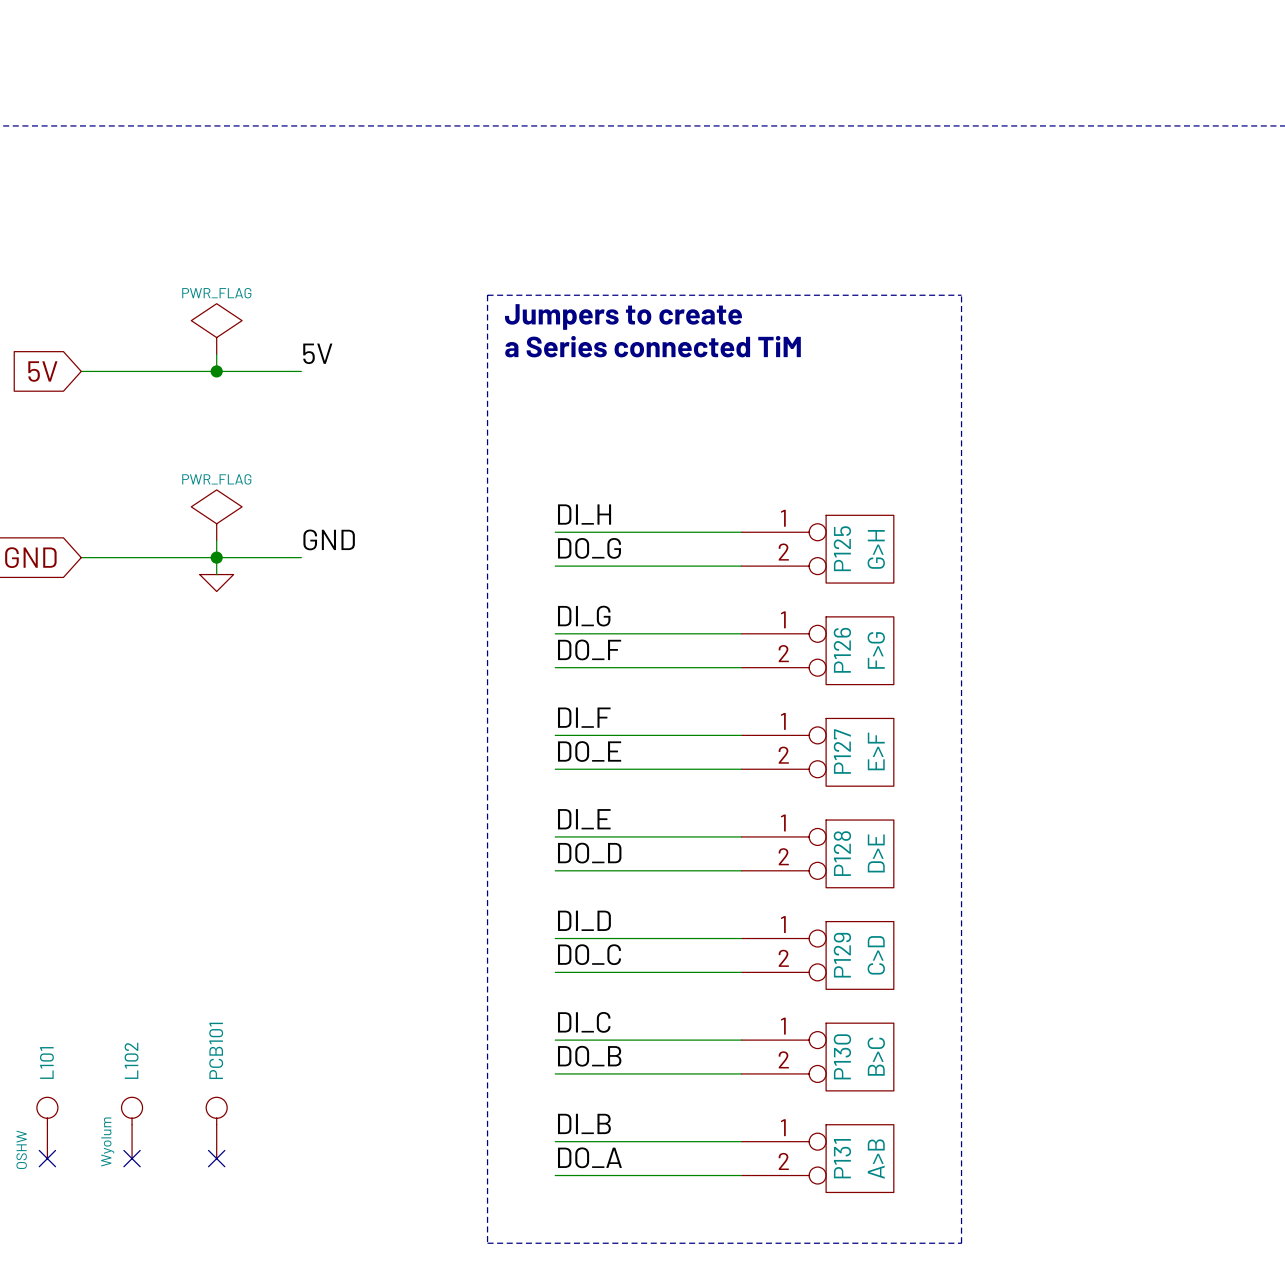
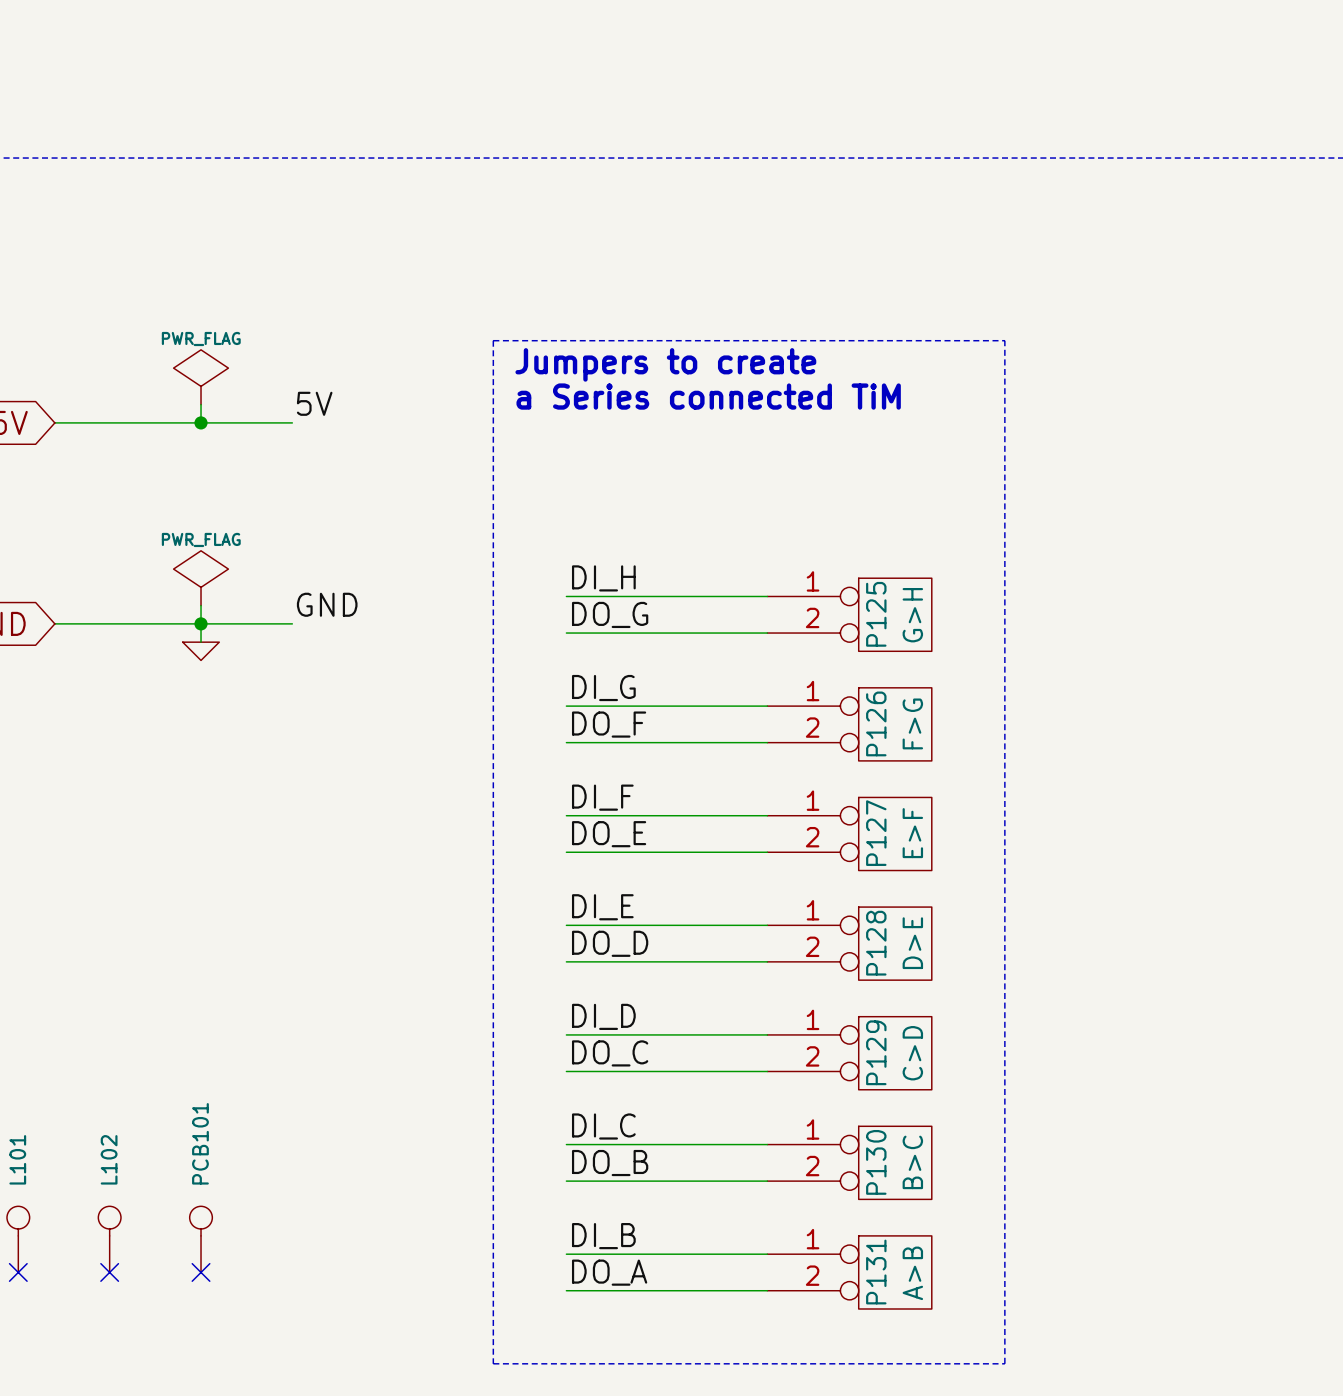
L102 value: Wyolum (107, 1142) -> none

